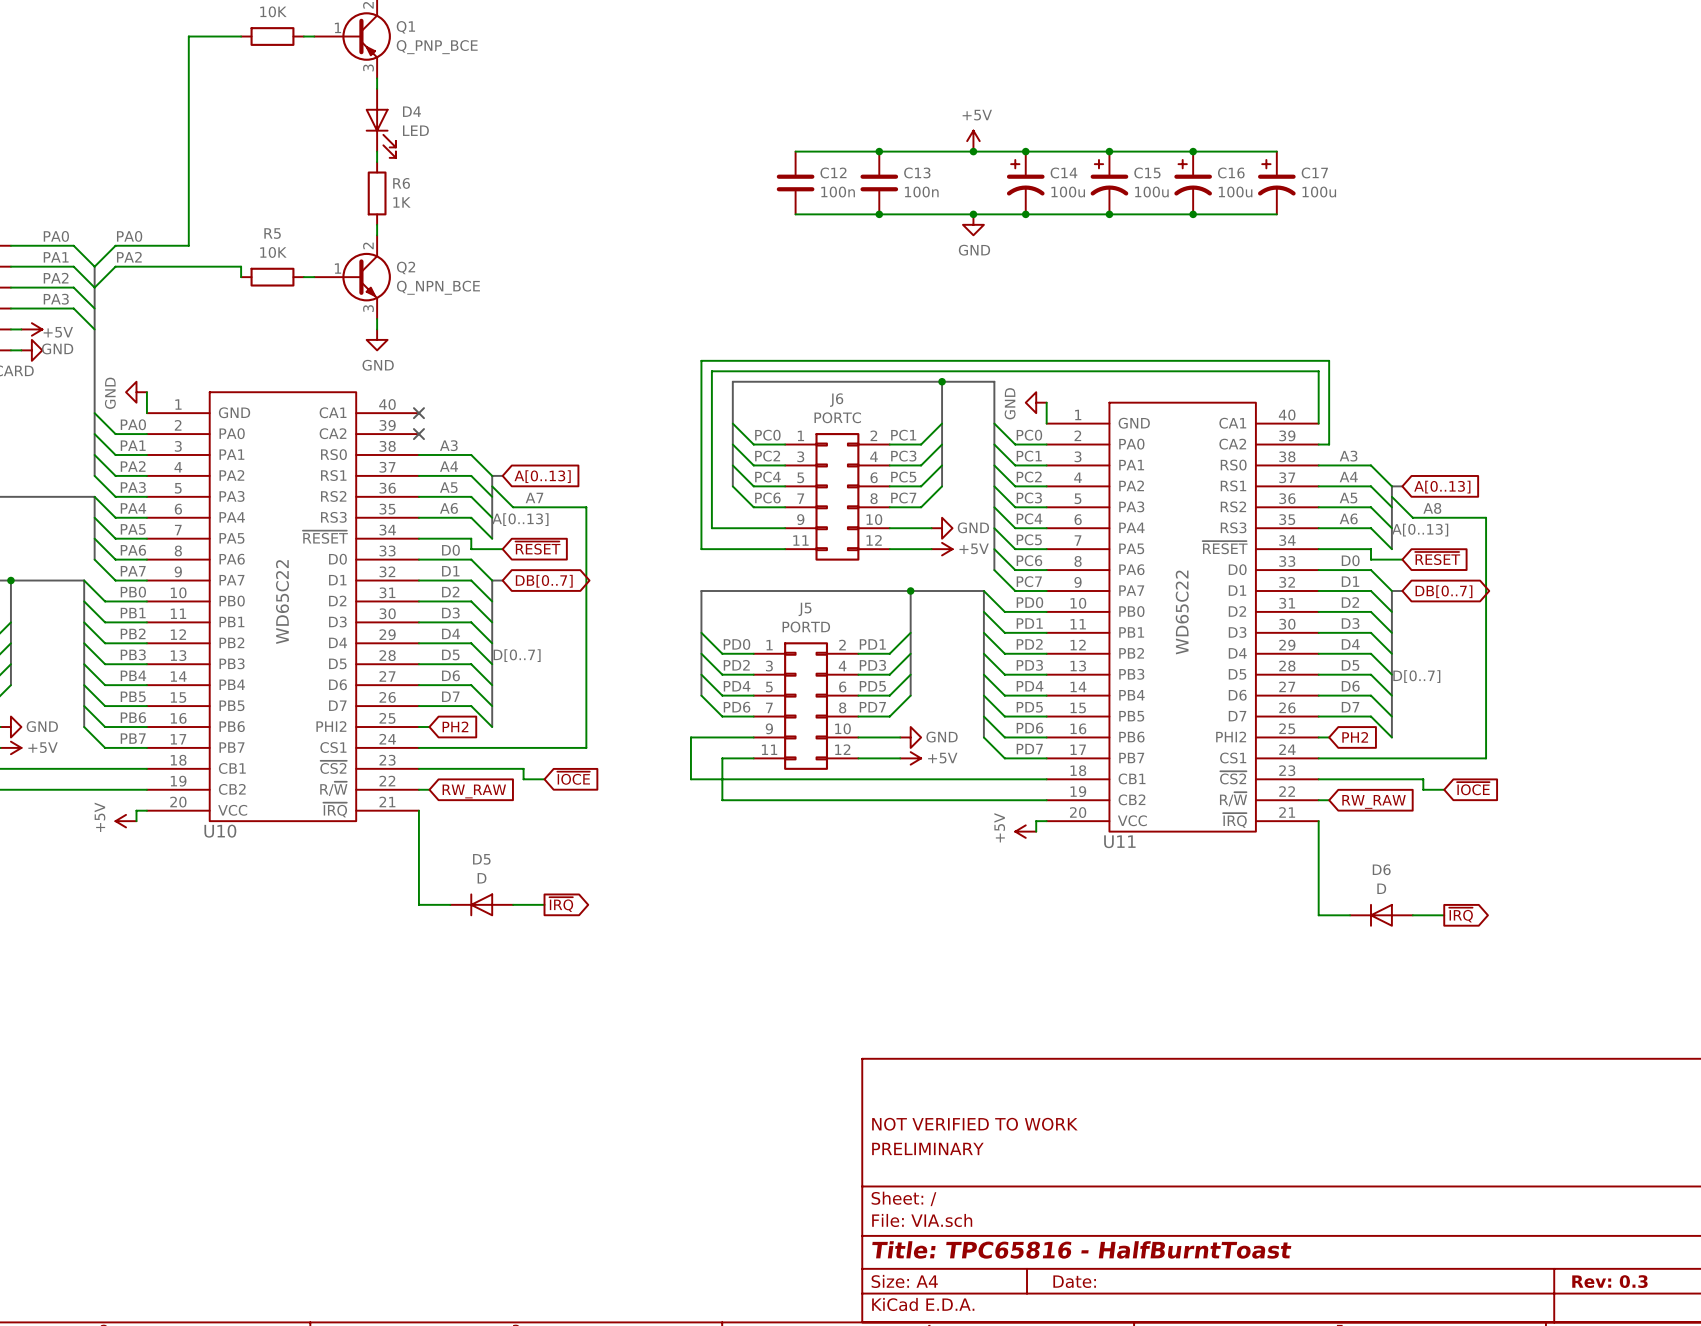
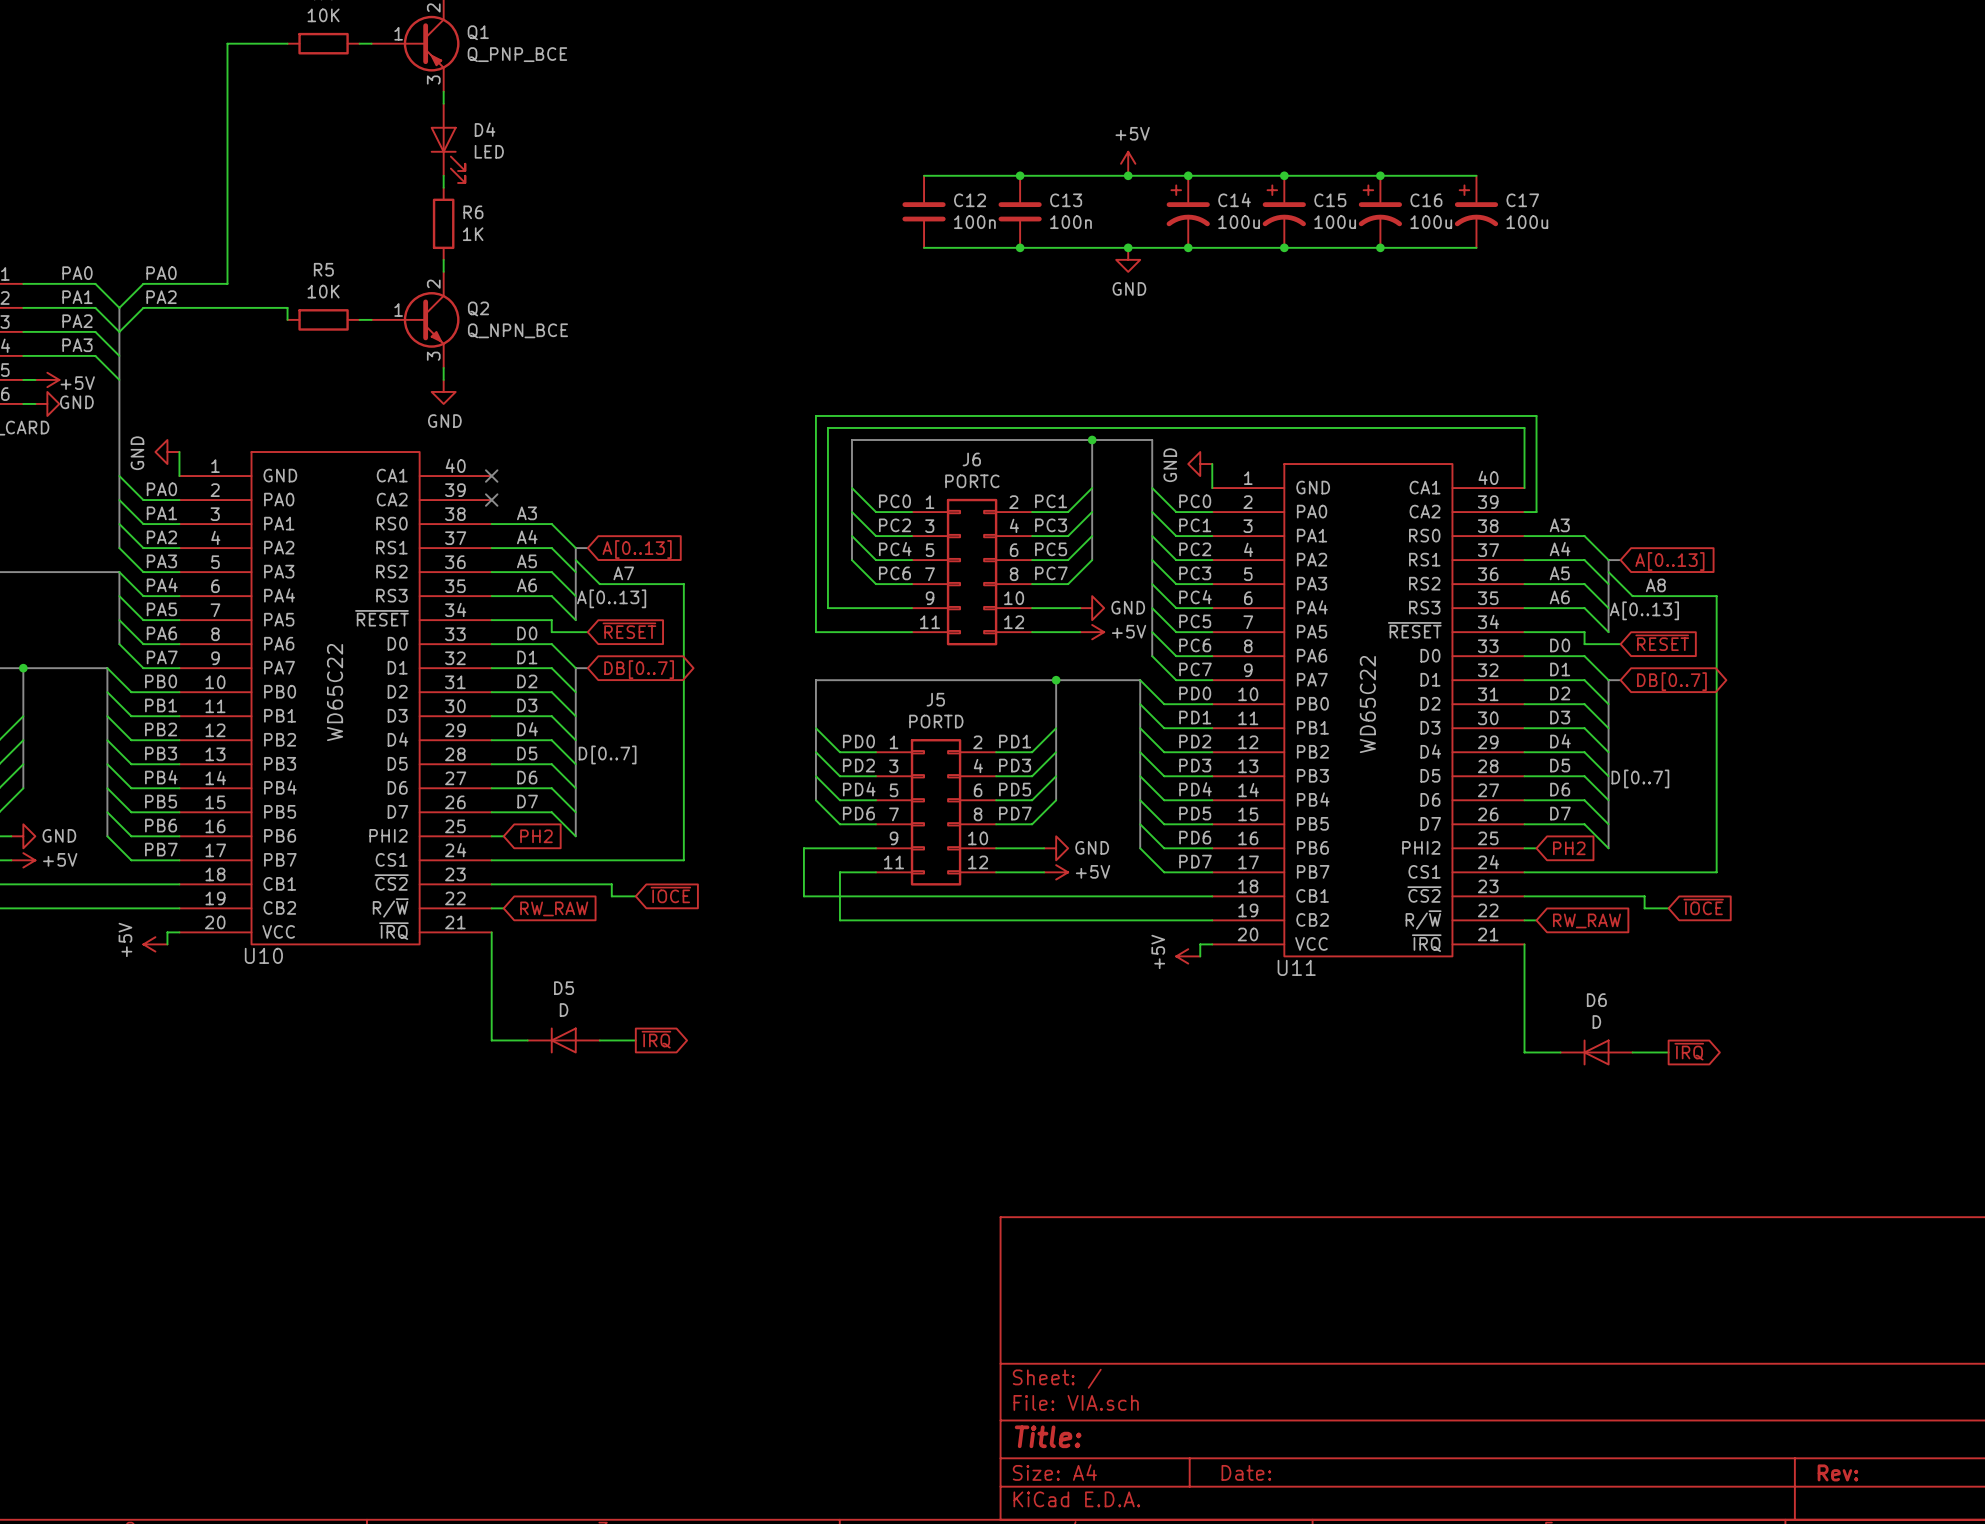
title block: NOT VERIFIED TO WORK (974, 1124) -> none
title block: PRELIMINARY (927, 1148) -> none
title block: Title: TPC65816 - HalfBurntToast (1081, 1249) -> Title: (1048, 1436)
title block: Rev: 0.3 (1609, 1281) -> Rev: (1837, 1472)

